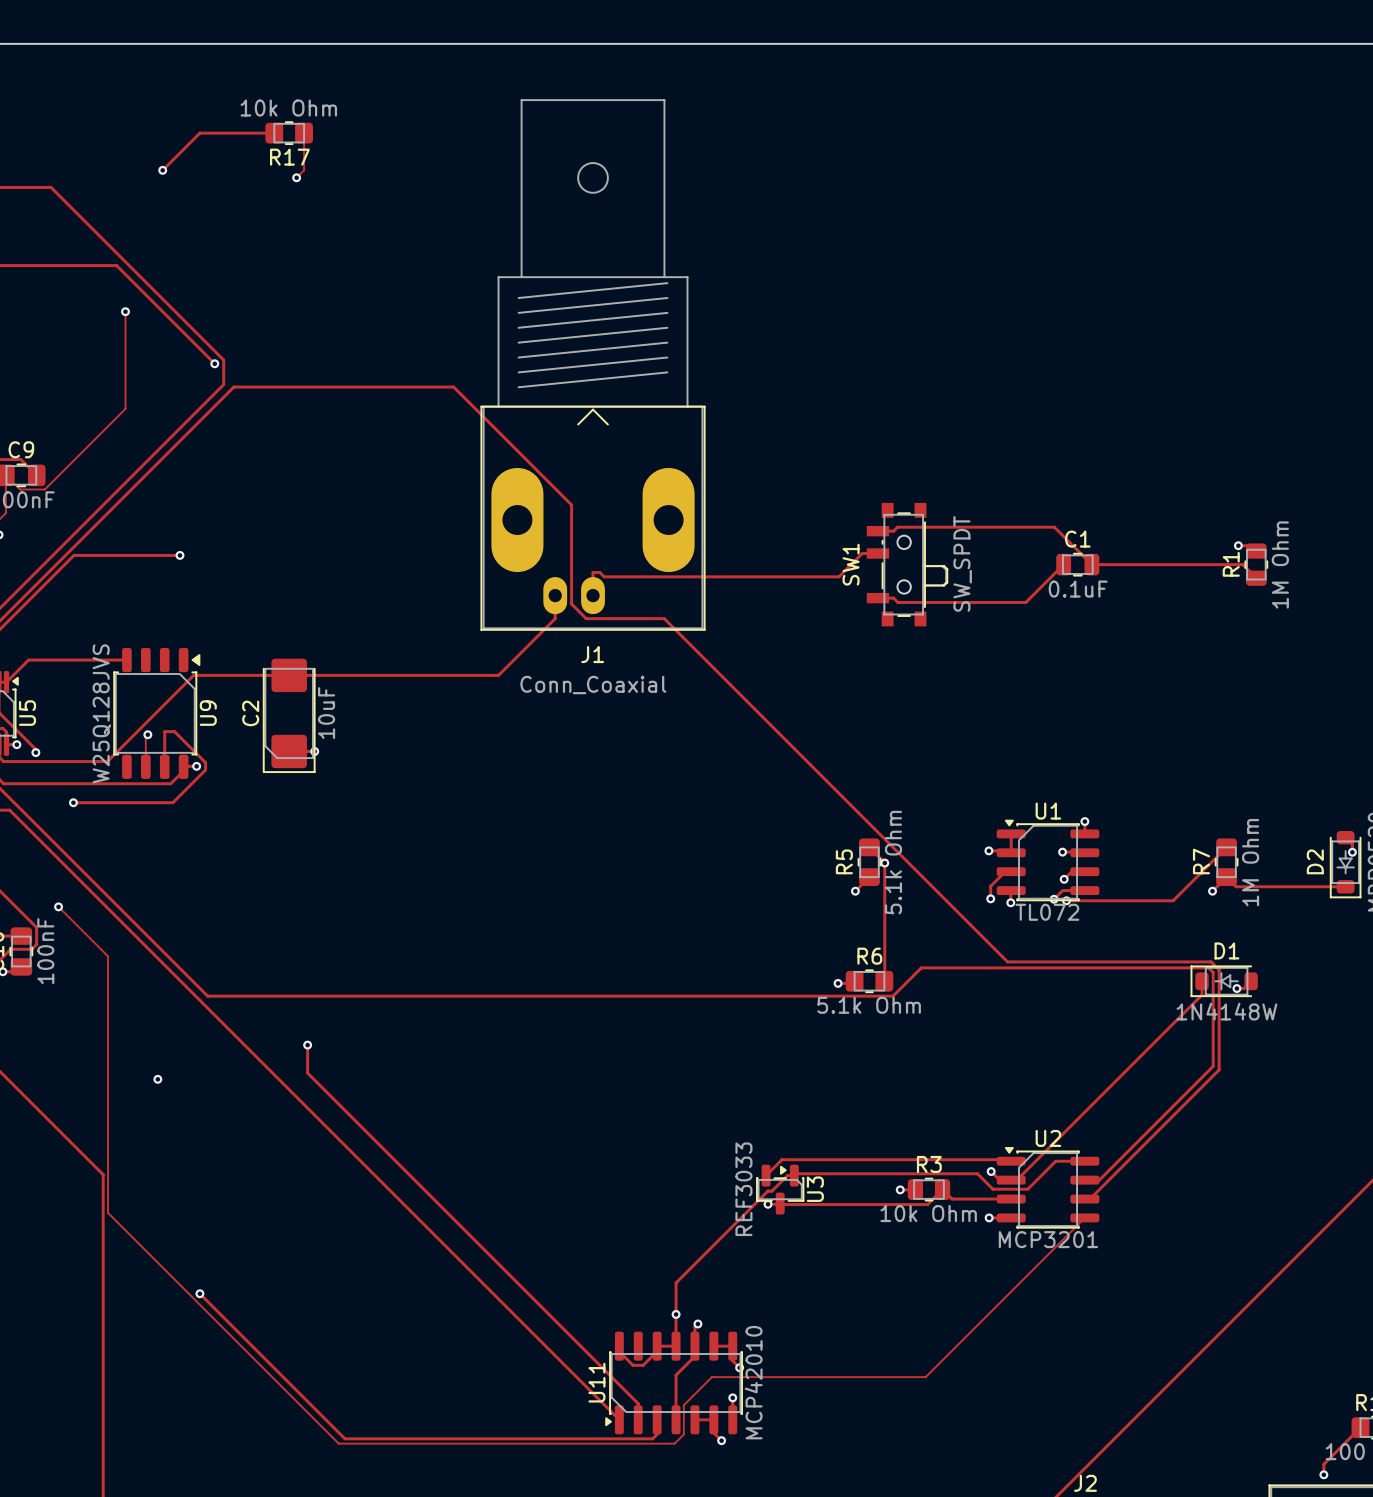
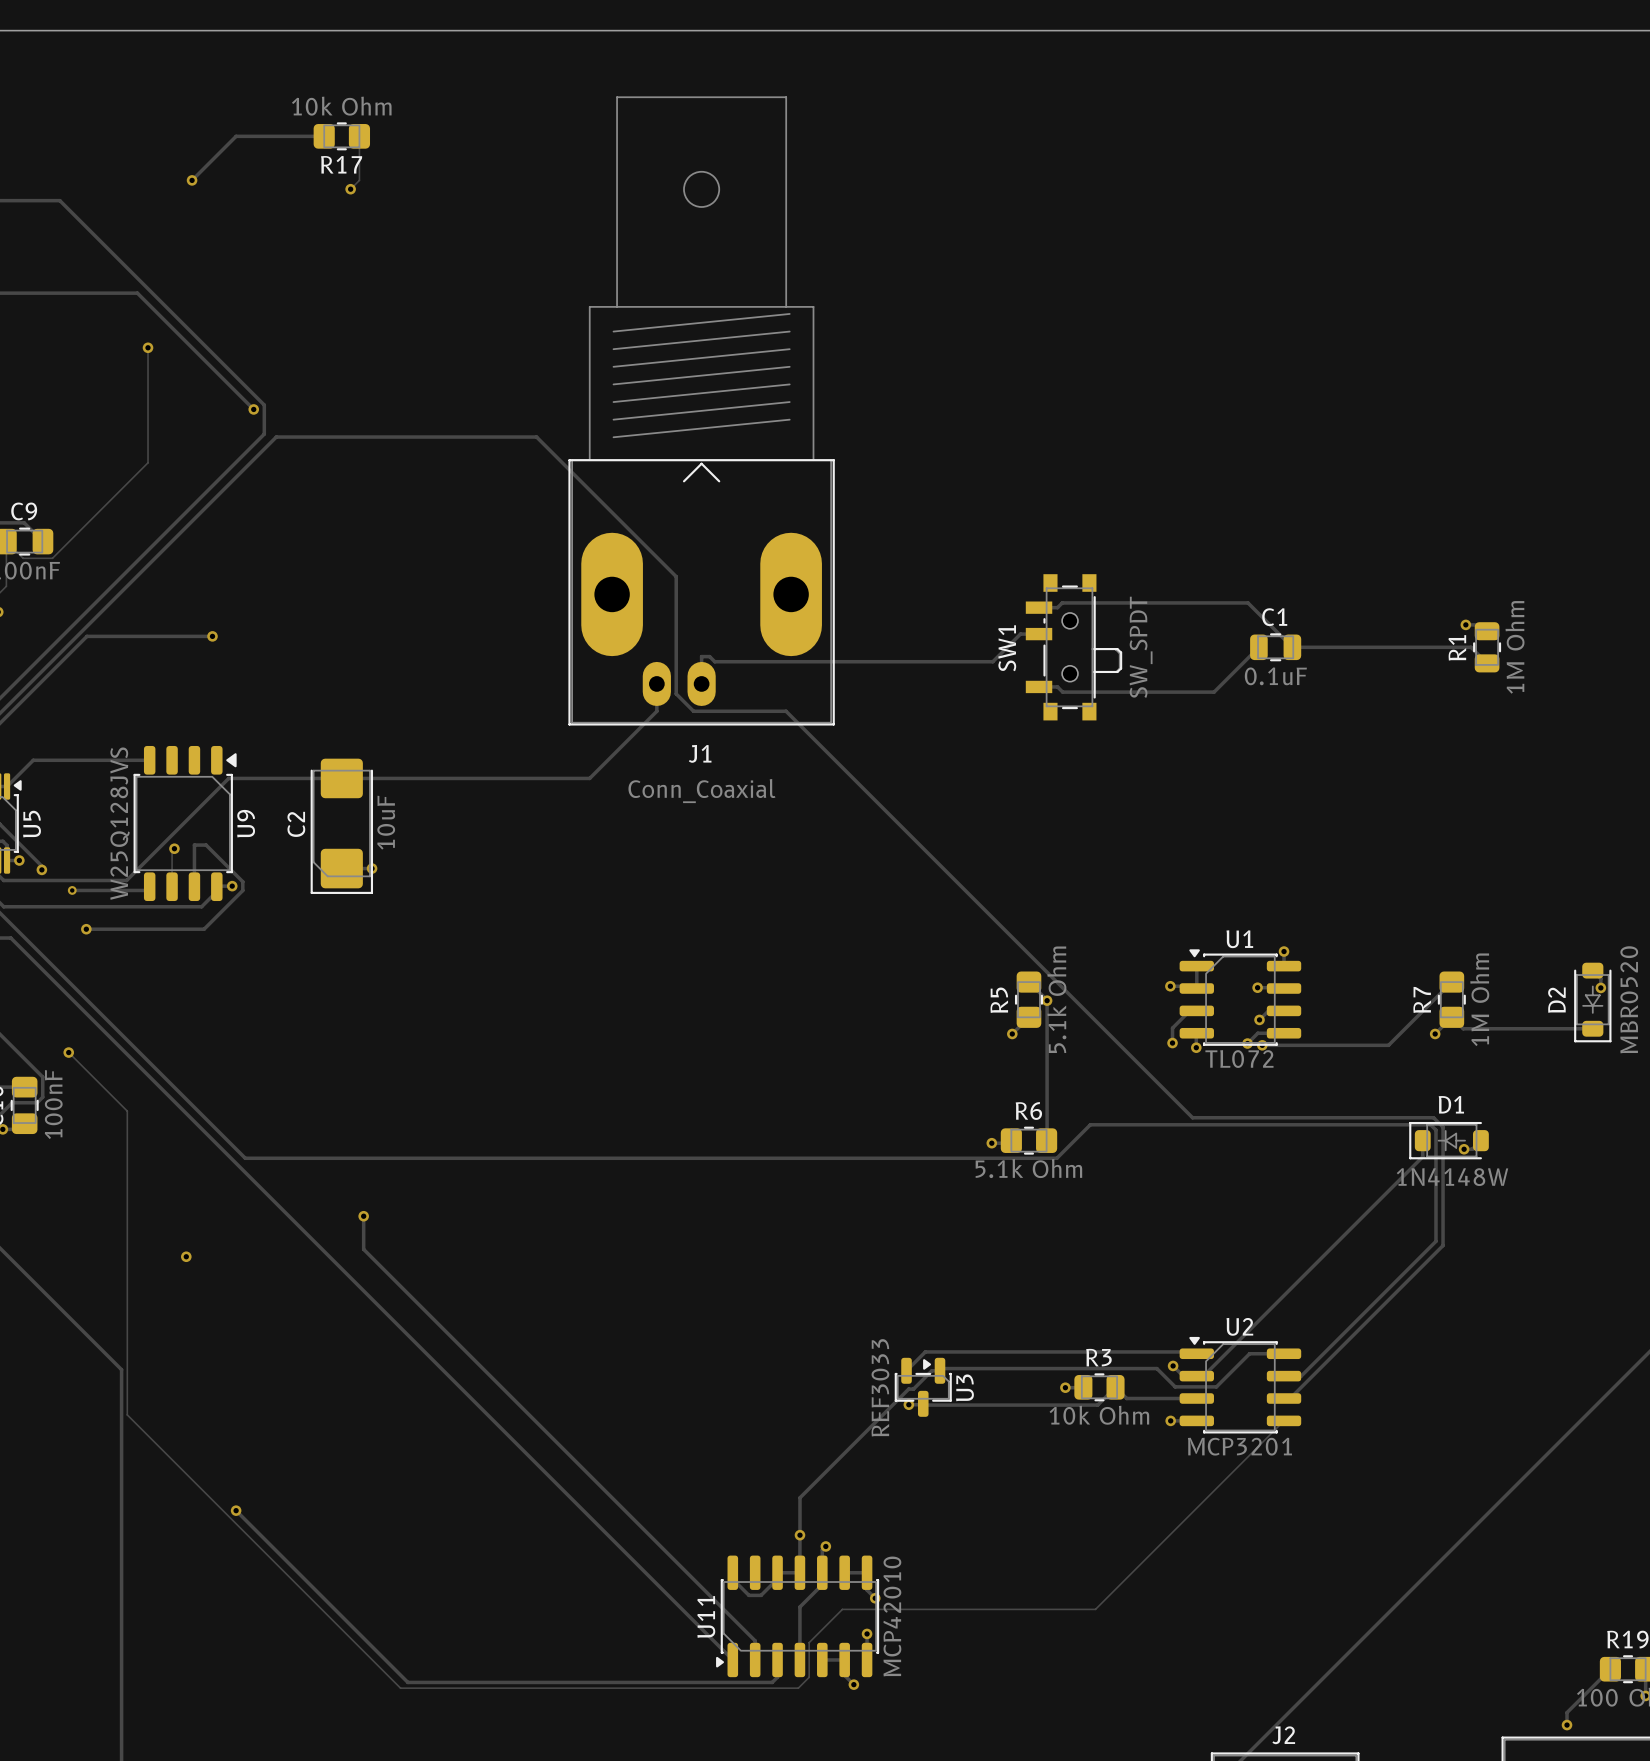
track: none -> (149, 886) (145, 890) (72, 890)
via: none -> (72, 890)

